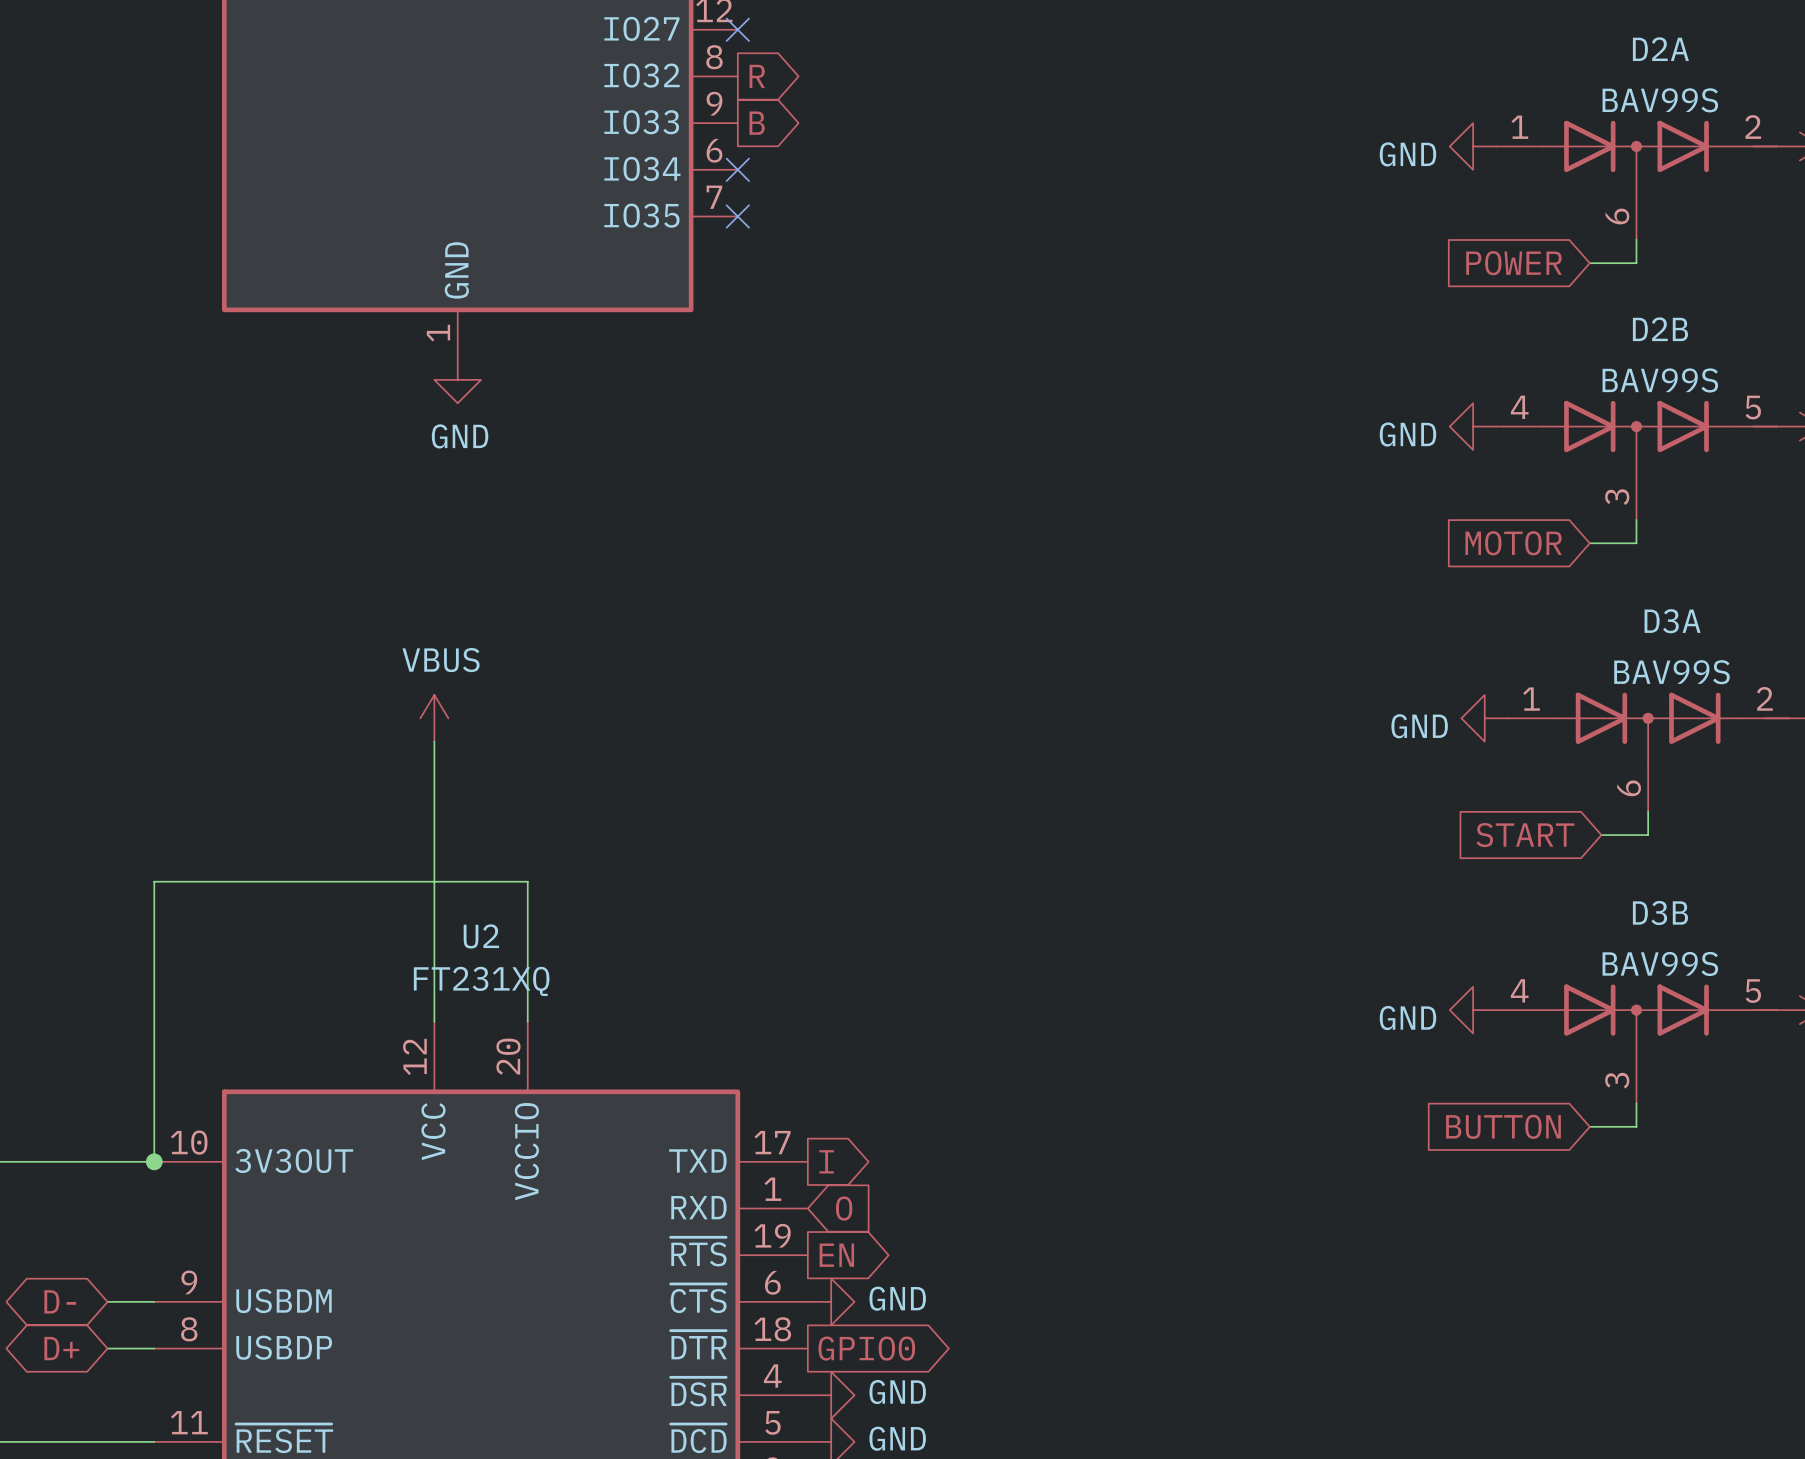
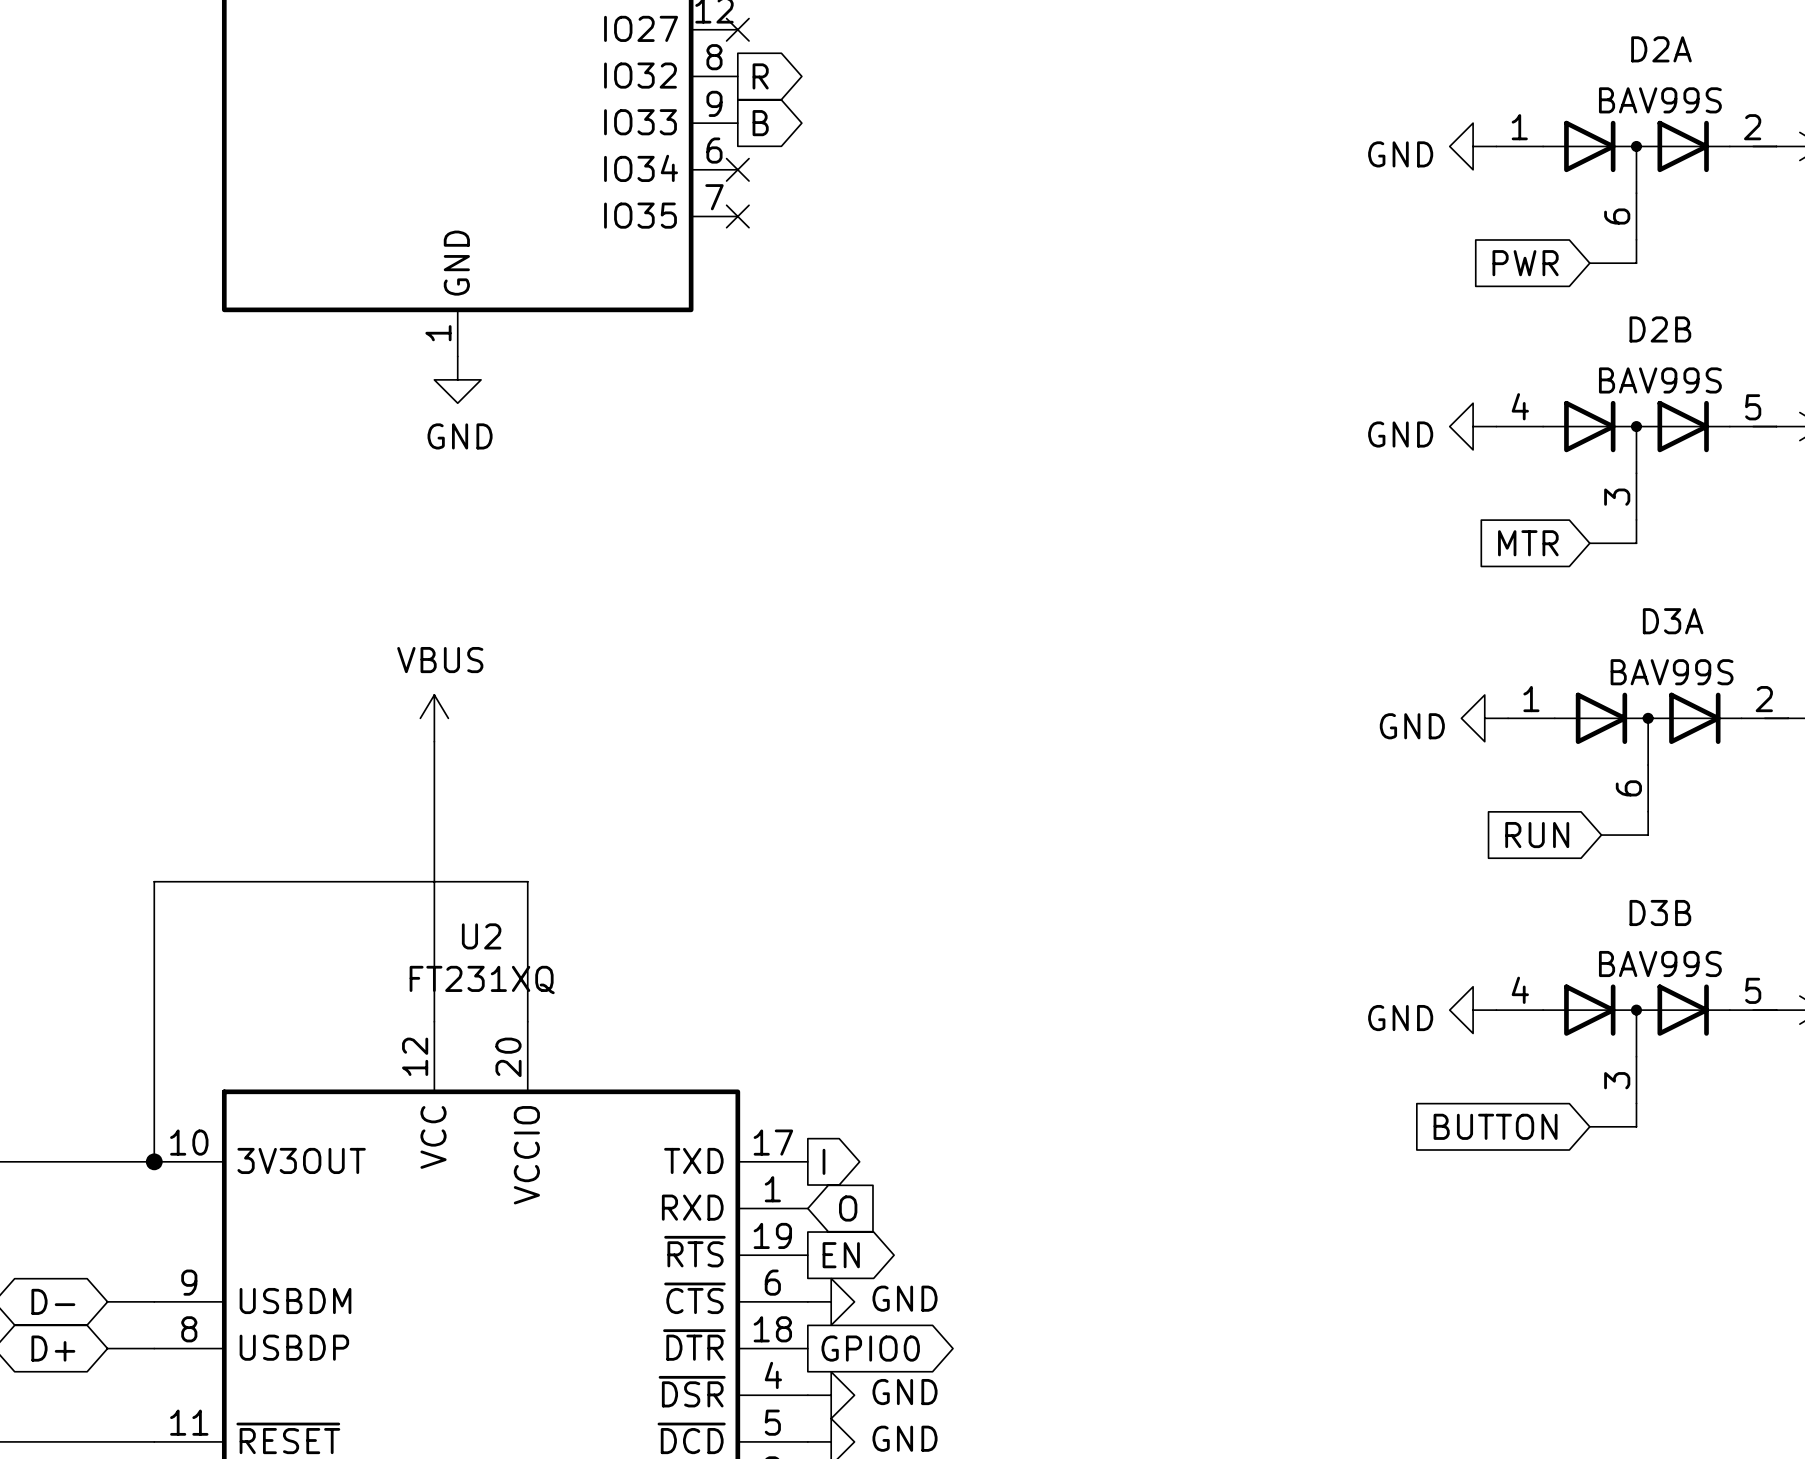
global label: POWER (1514, 263) -> PWR (1525, 263)
global label: MOTOR (1513, 543) -> MTR (1528, 543)
global label: START (1525, 835) -> RUN (1537, 835)

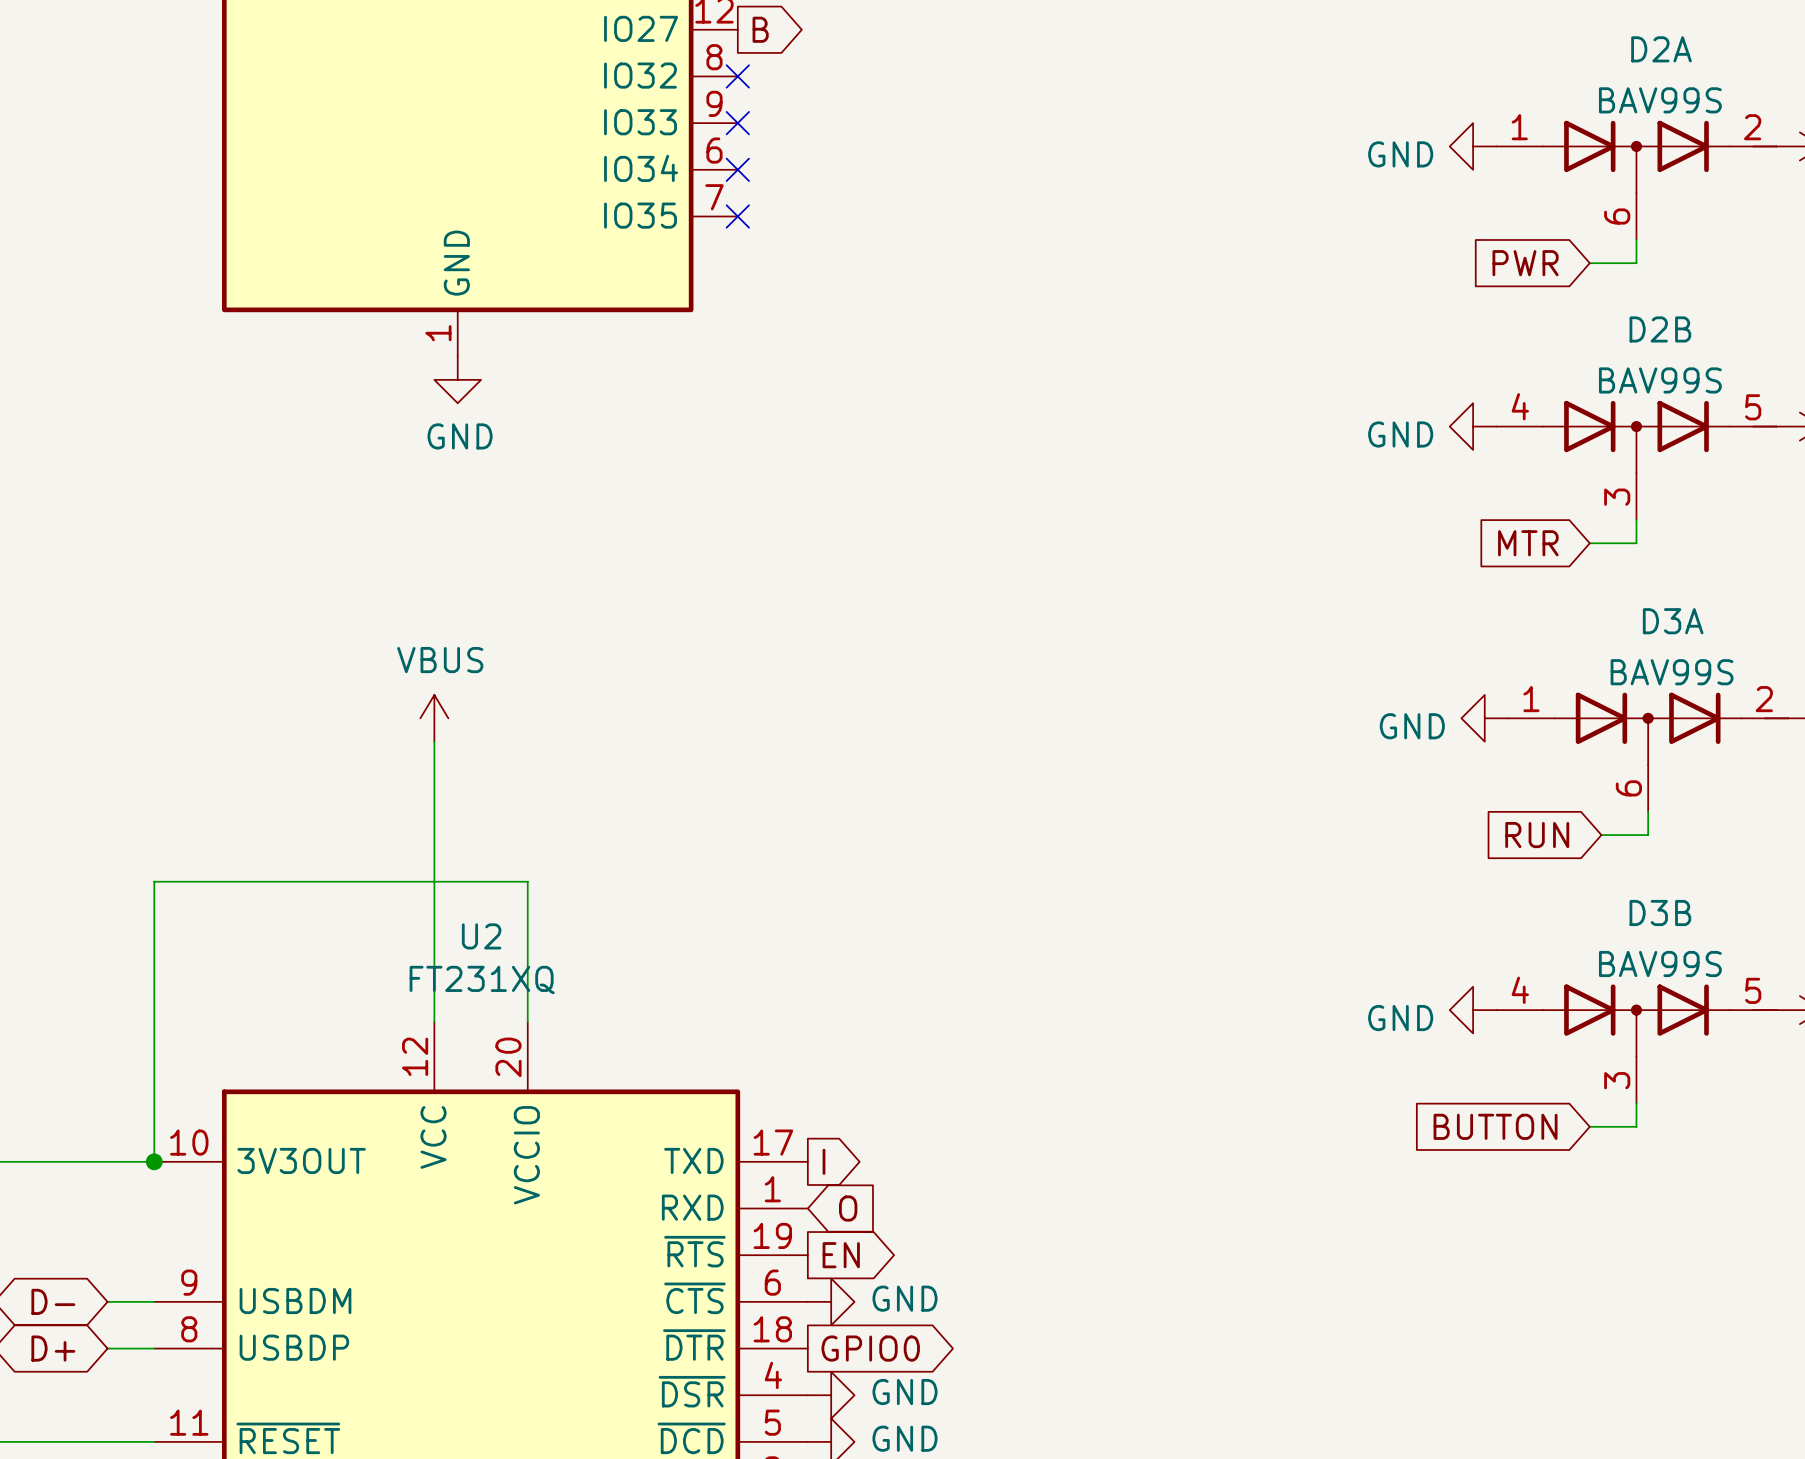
no-connect mark: (737, 29) -> none
no-connect mark: none -> (737, 76)
global label: R (760, 76) -> none
no-connect mark: none -> (737, 123)
global label position: B (760, 123) -> B (760, 29)

